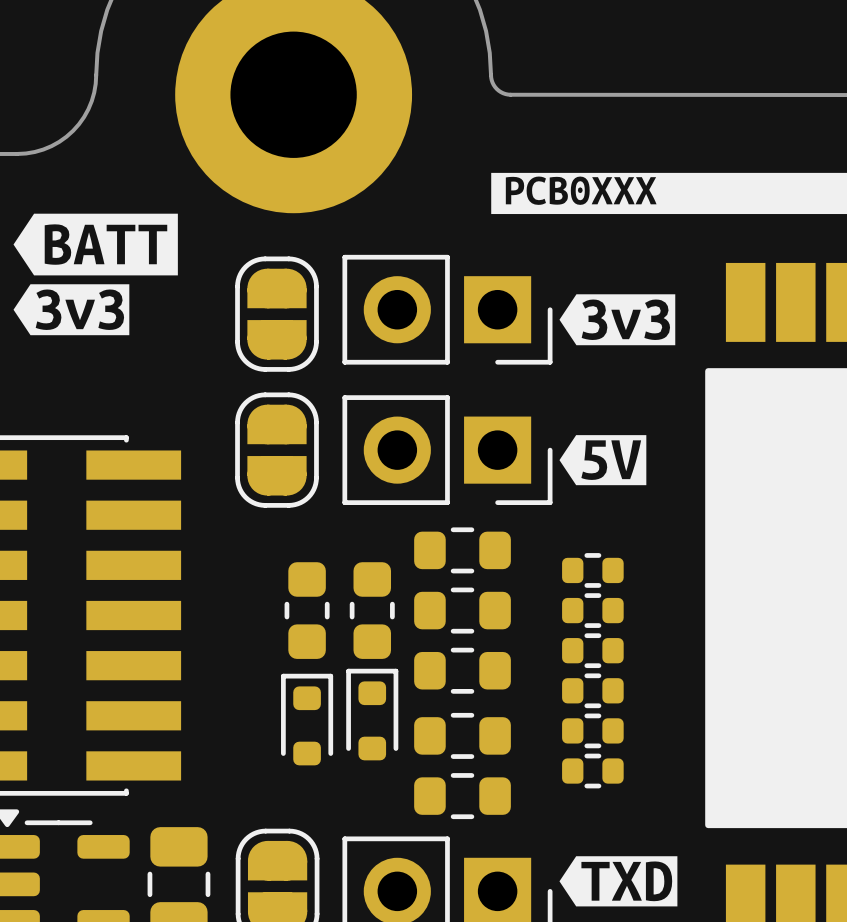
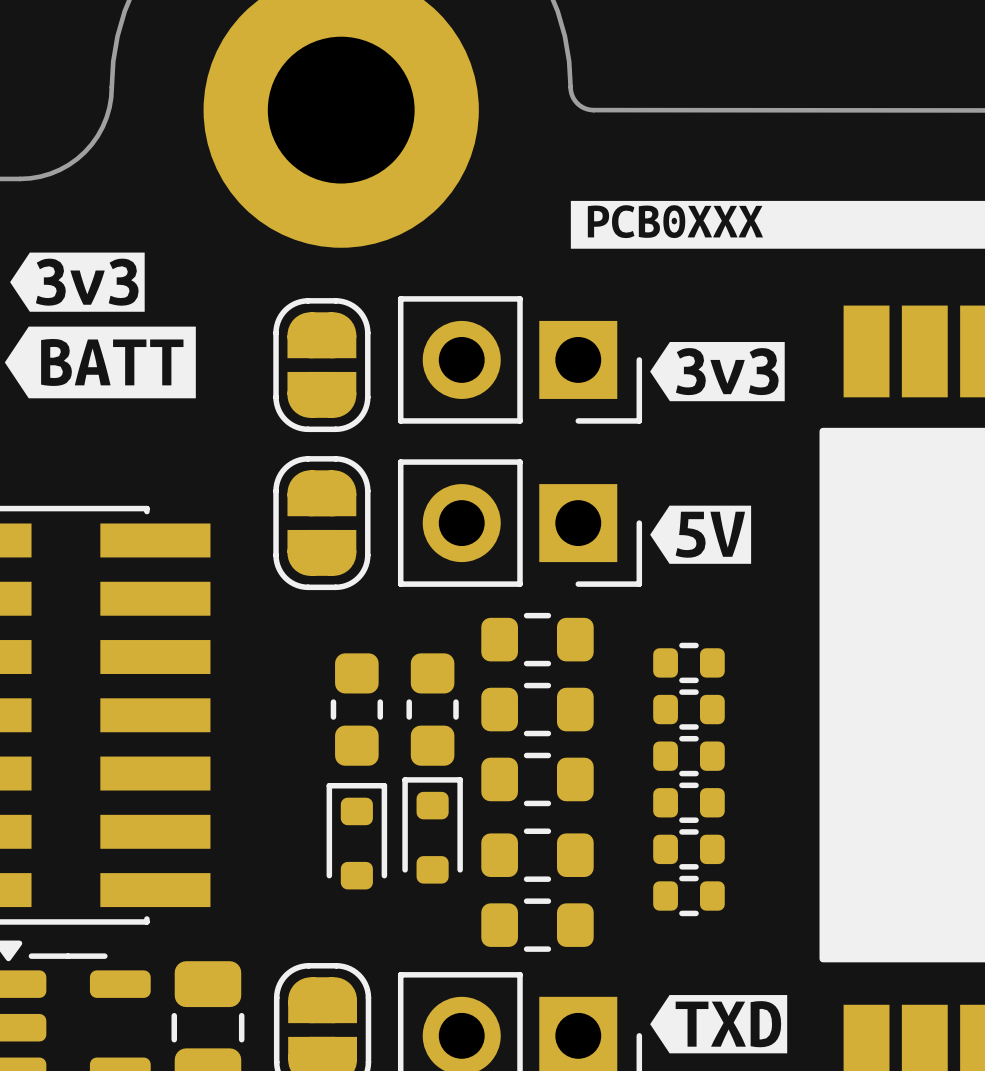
drawing position: (95, 244) -> (100, 362)
drawing position: (71, 309) -> (77, 282)

